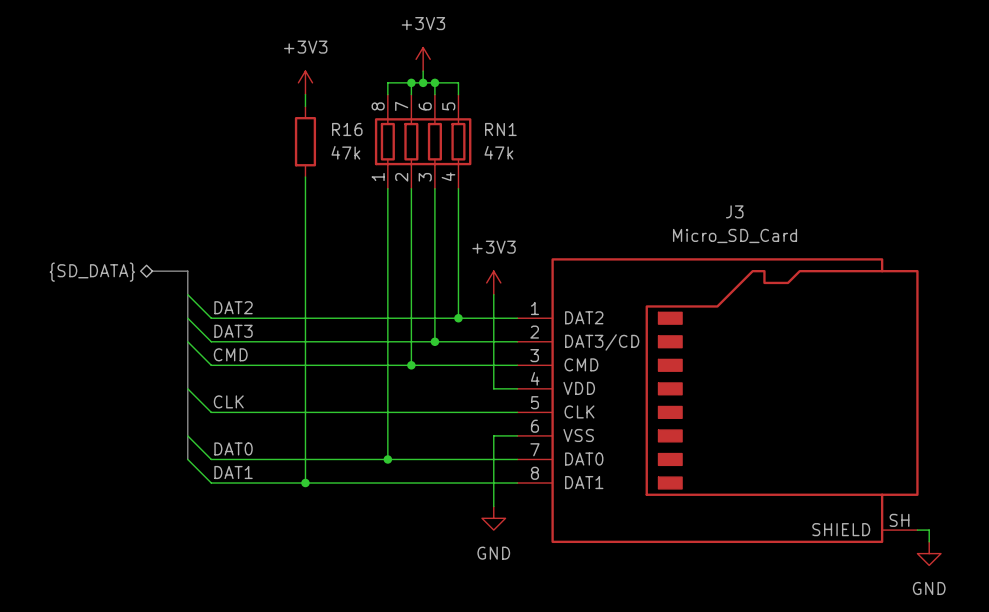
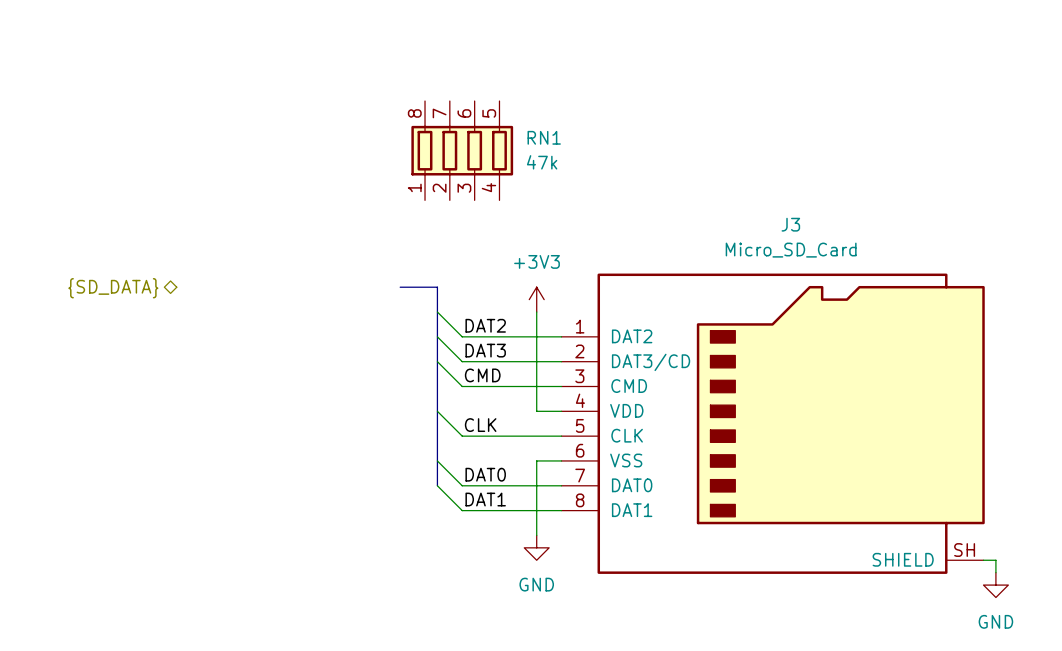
power symbol: +3V3 (423, 59) -> none
wire: (423, 71) (423, 82) -> none
power symbol: +3V3 (305, 82) -> none
wire: (411, 82) (411, 94) -> none
junction: (411, 82) -> none
junction: (423, 82) -> none
wire: (434, 82) (434, 94) -> none
junction: (434, 82) -> none
wire: (305, 94) (305, 106) -> none
wire: (387, 94) (387, 82) (458, 82) (458, 94) -> none
R16: 47k (305, 141) -> none
wire: (305, 177) (305, 483) -> none
wire: (387, 188) (387, 459) -> none
wire: (411, 188) (411, 365) -> none
wire: (434, 188) (434, 341) -> none
wire: (458, 188) (458, 318) -> none
bus: (152, 271) (187, 271) (187, 459) -> (400, 287) (437, 287) (437, 485)
wire: (187, 294) (211, 318) (423, 318) -> (437, 312) (462, 336)
label position: DAT2 (233, 307) -> DAT2 (485, 325)
wire: (187, 318) (211, 341) (423, 341) -> (437, 336) (462, 361)
junction: (458, 318) -> none
label position: DAT3 (233, 331) -> DAT3 (485, 350)
wire: (187, 341) (211, 365) (423, 365) -> (437, 361) (462, 386)
junction: (434, 341) -> none
label position: CMD (230, 354) -> CMD (482, 375)
junction: (411, 365) -> none
wire: (187, 388) (211, 412) (423, 412) -> (437, 411) (462, 436)
label position: CLK (228, 401) -> CLK (480, 425)
wire: (187, 435) (211, 459) (423, 459) -> (437, 460) (462, 485)
label position: DAT0 (233, 448) -> DAT0 (485, 474)
wire: (187, 459) (211, 483) (423, 483) -> (437, 485) (462, 510)
junction: (387, 459) -> none
label position: DAT1 (233, 472) -> DAT1 (485, 499)
junction: (305, 483) -> none

